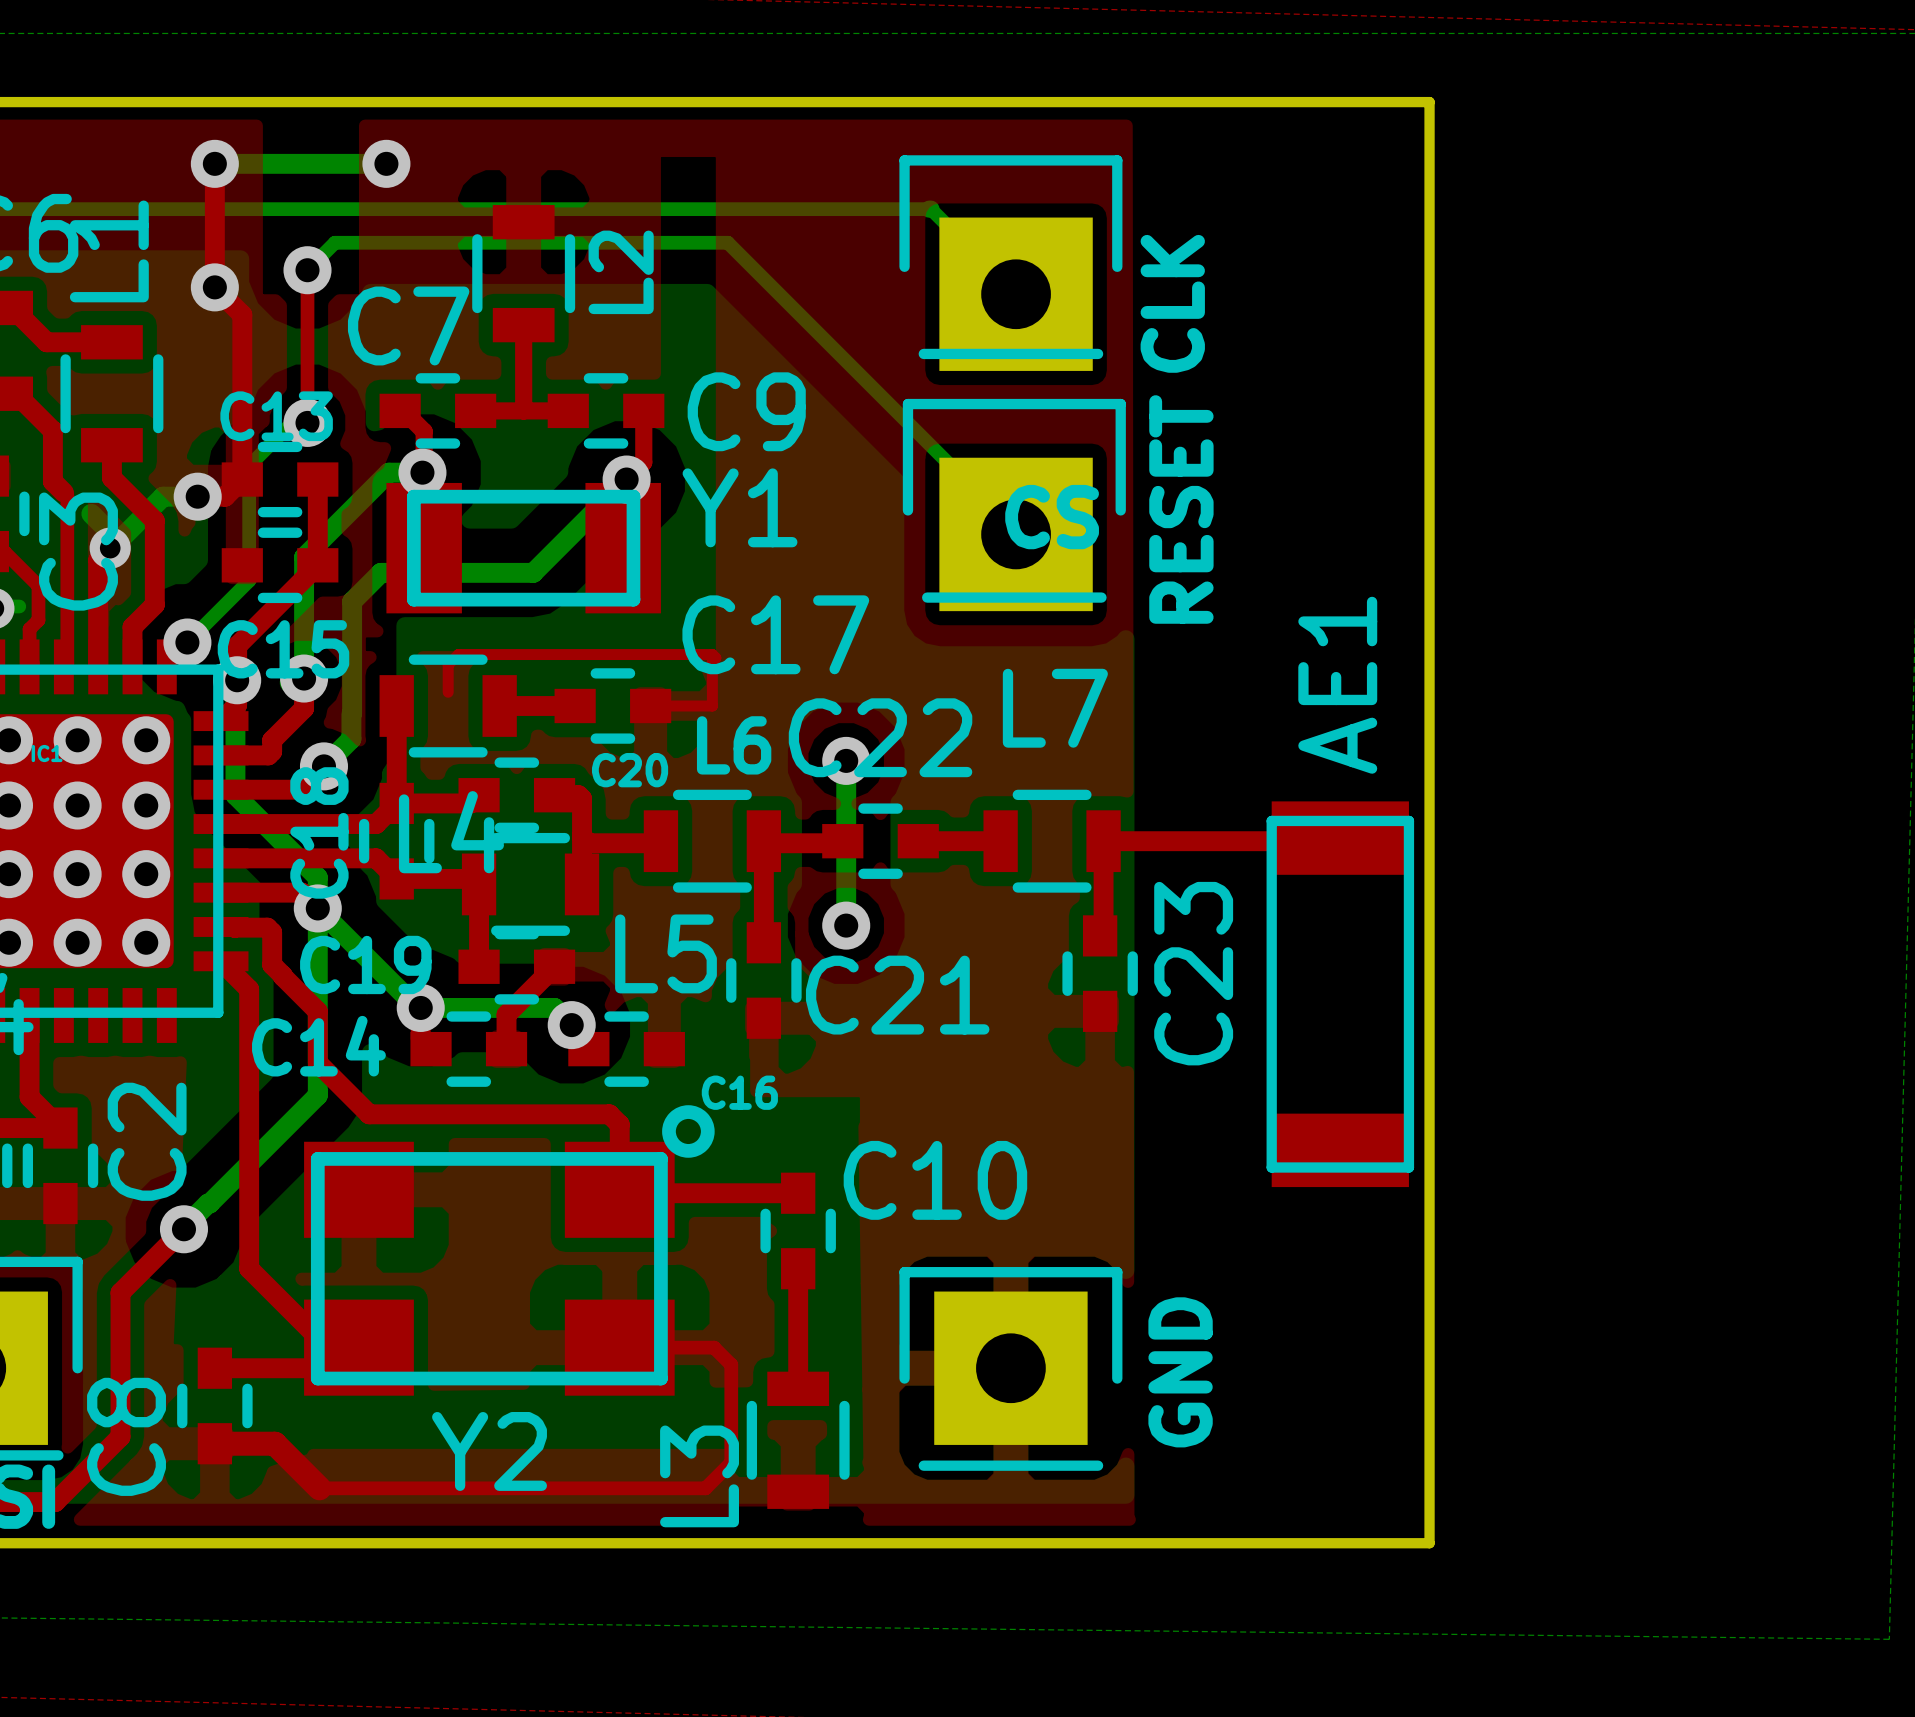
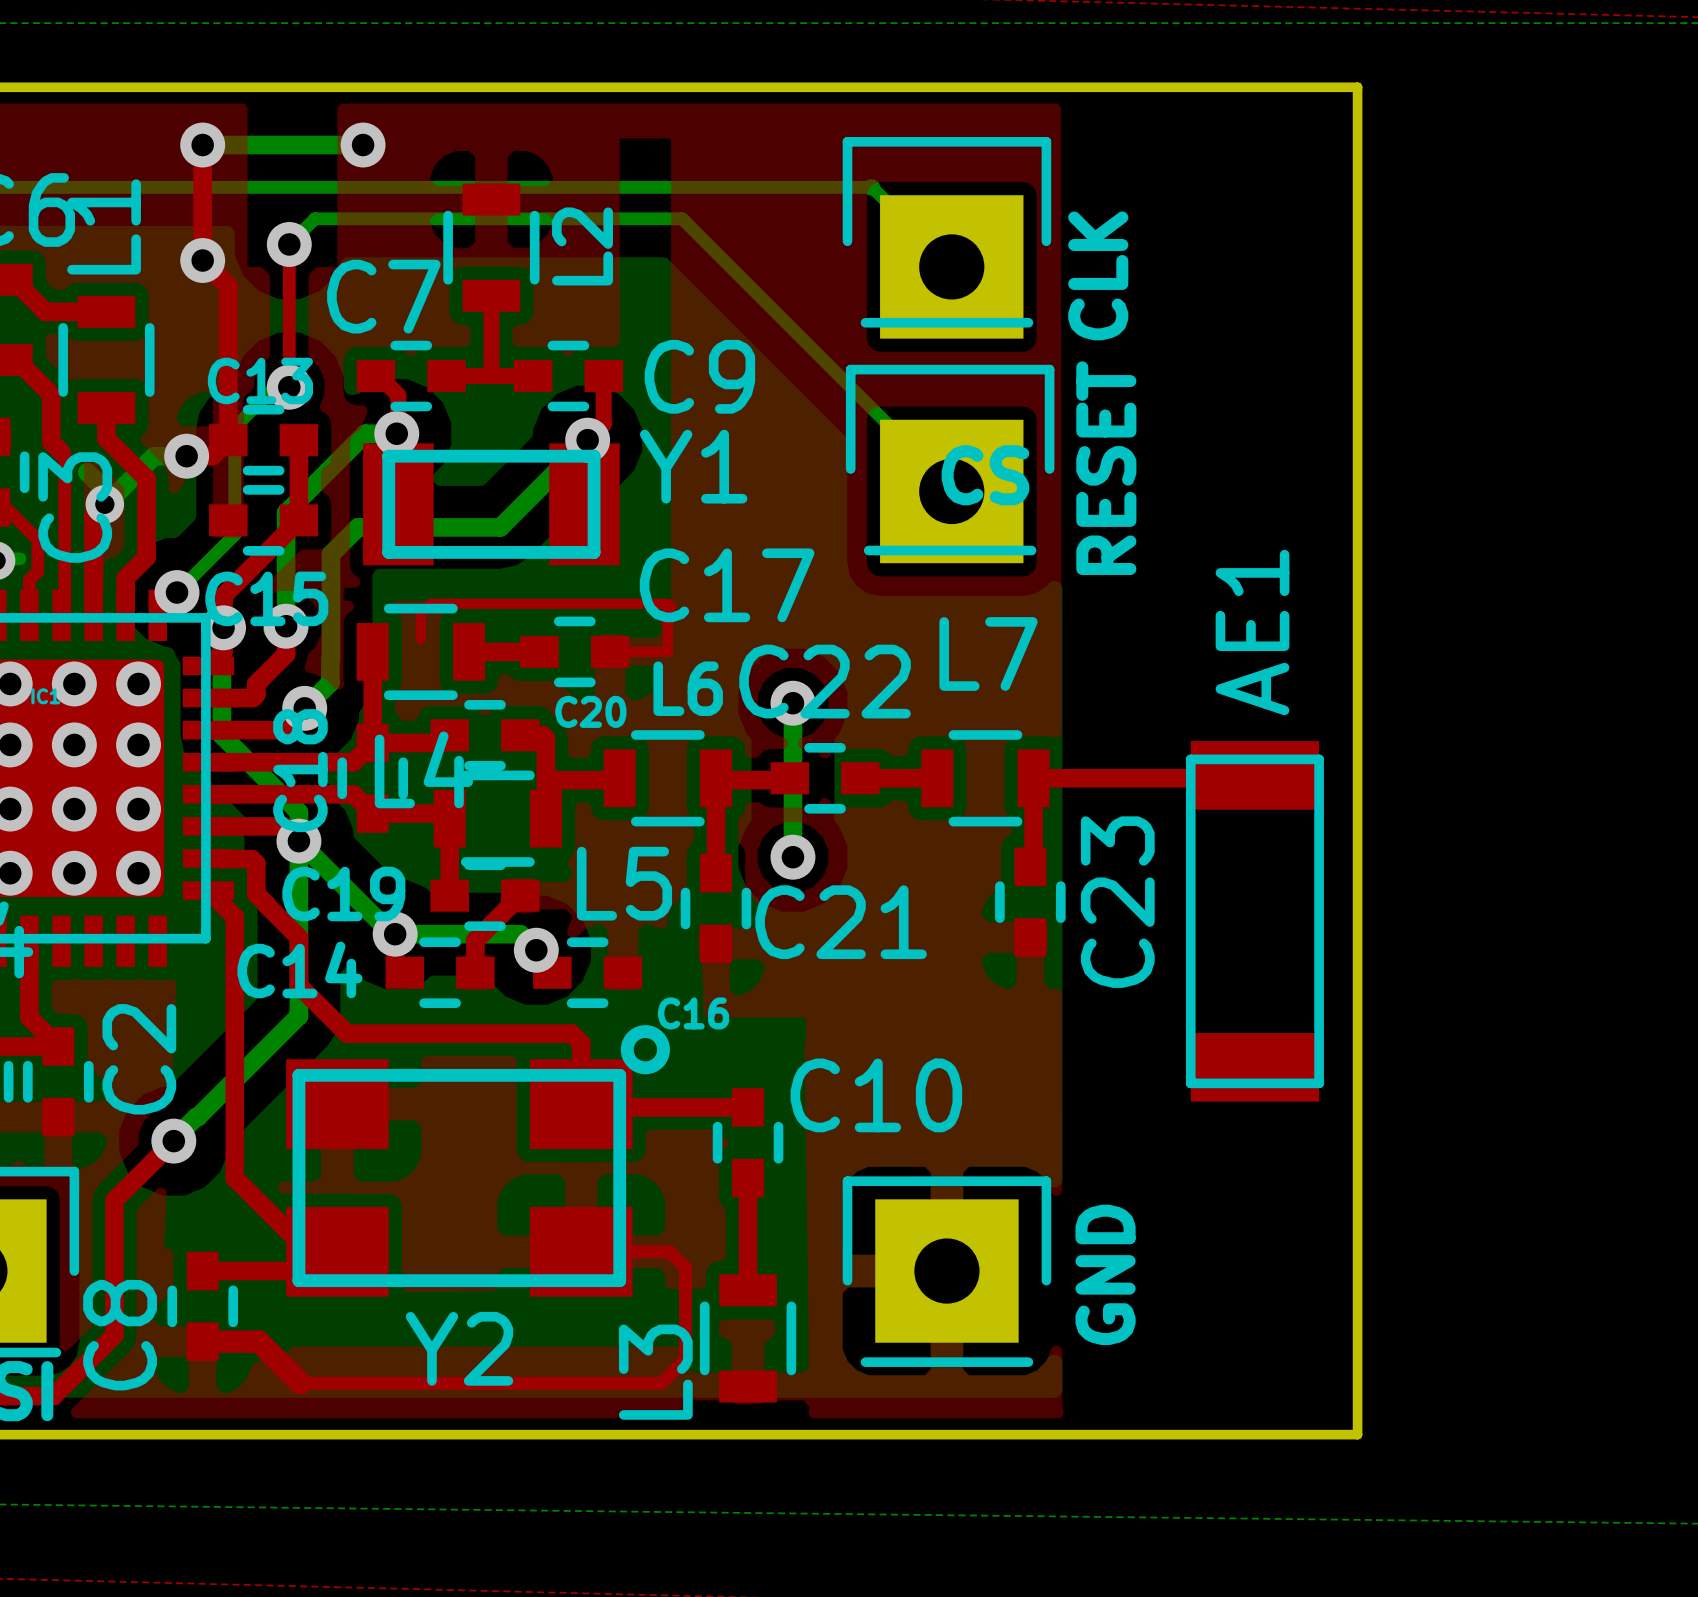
board edge: (1429, 102) (1429, 1543) -> (1338, 87) (1357, 87) (1357, 1434) (1338, 1434)

